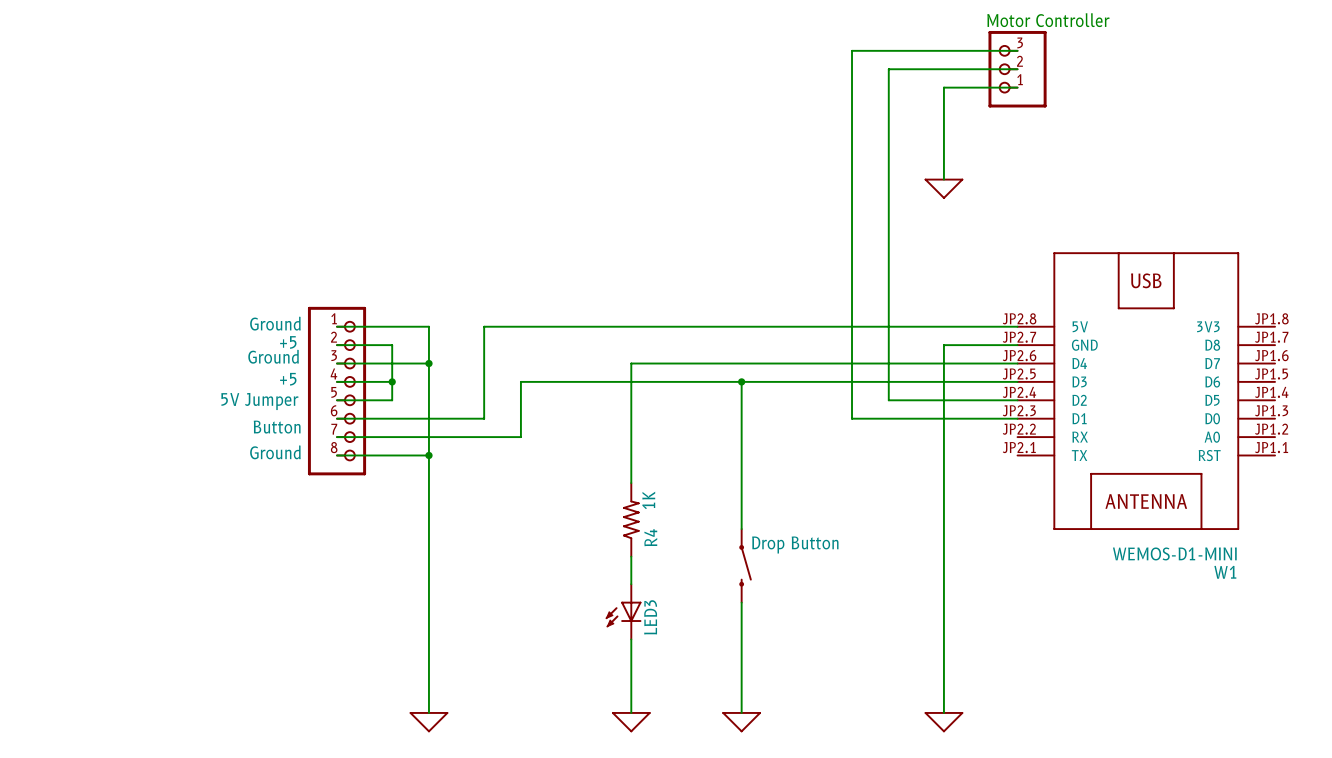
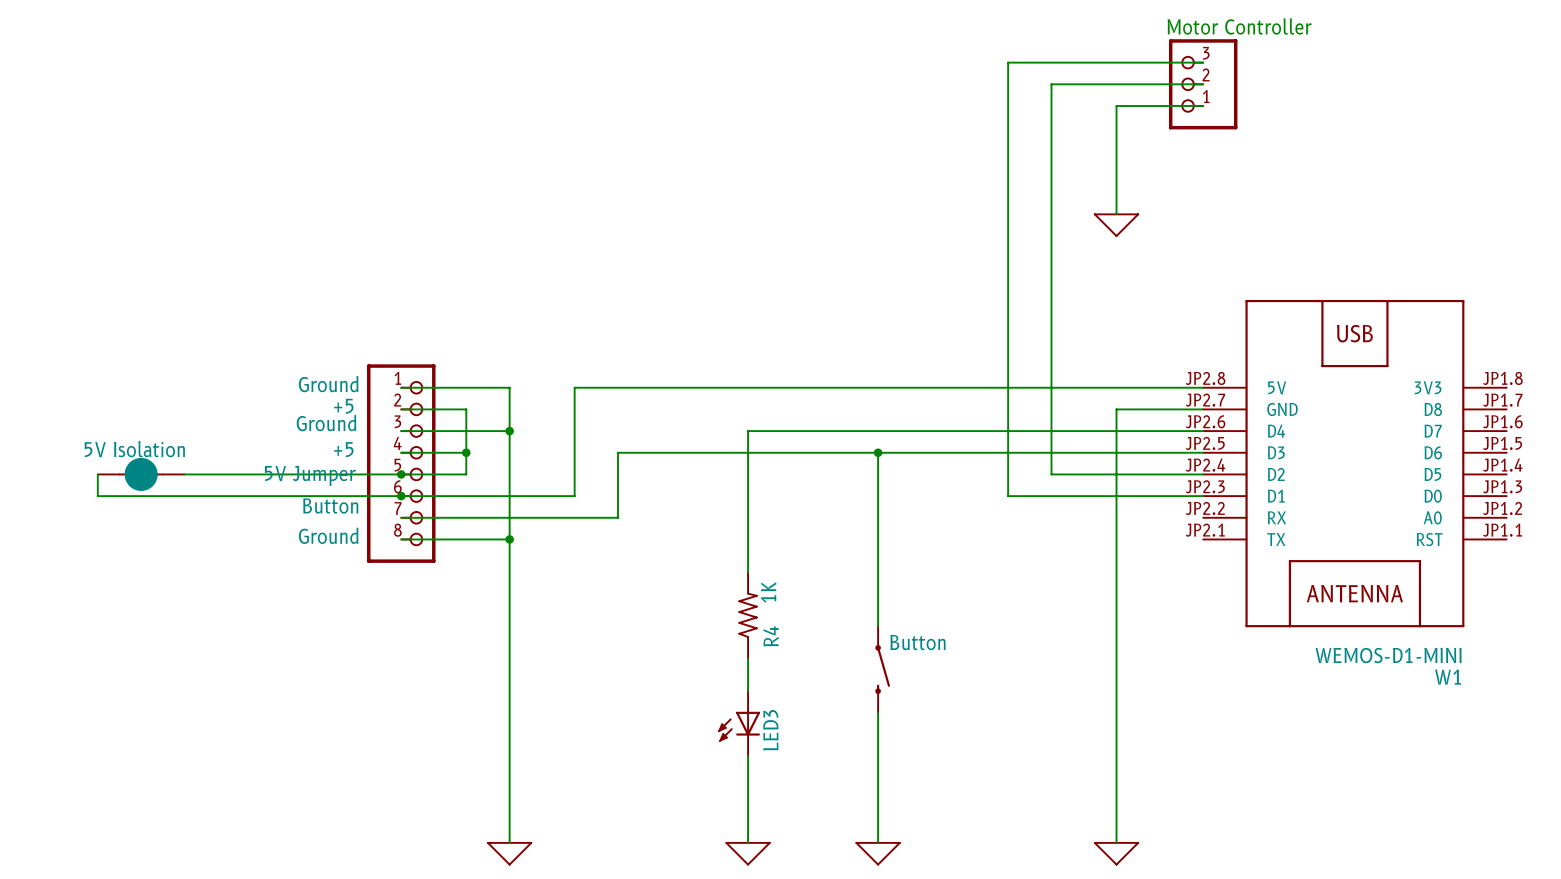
text: none -> 5V Isolation (134, 449)
wire: none -> (97, 474) (97, 496) (401, 496)
part: none -> (141, 474)
wire: none -> (184, 474) (401, 474)
junction: none -> (401, 474)
junction: none -> (401, 496)
text: Drop Button (795, 545) -> Button (917, 642)

